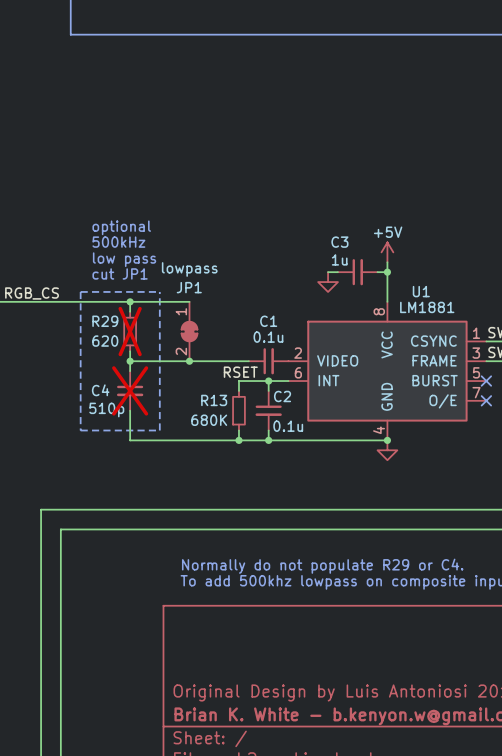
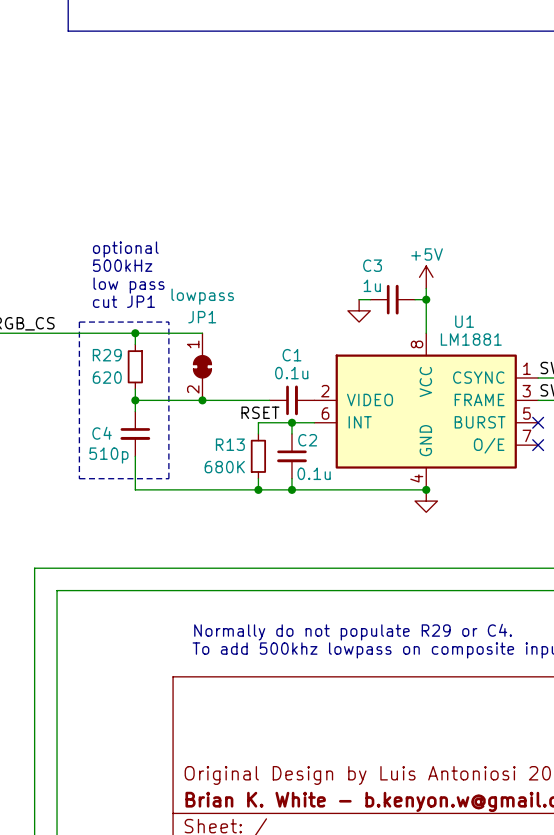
R29 do-not-place cross: (130, 331) -> none
C4 do-not-place cross: (130, 390) -> none

